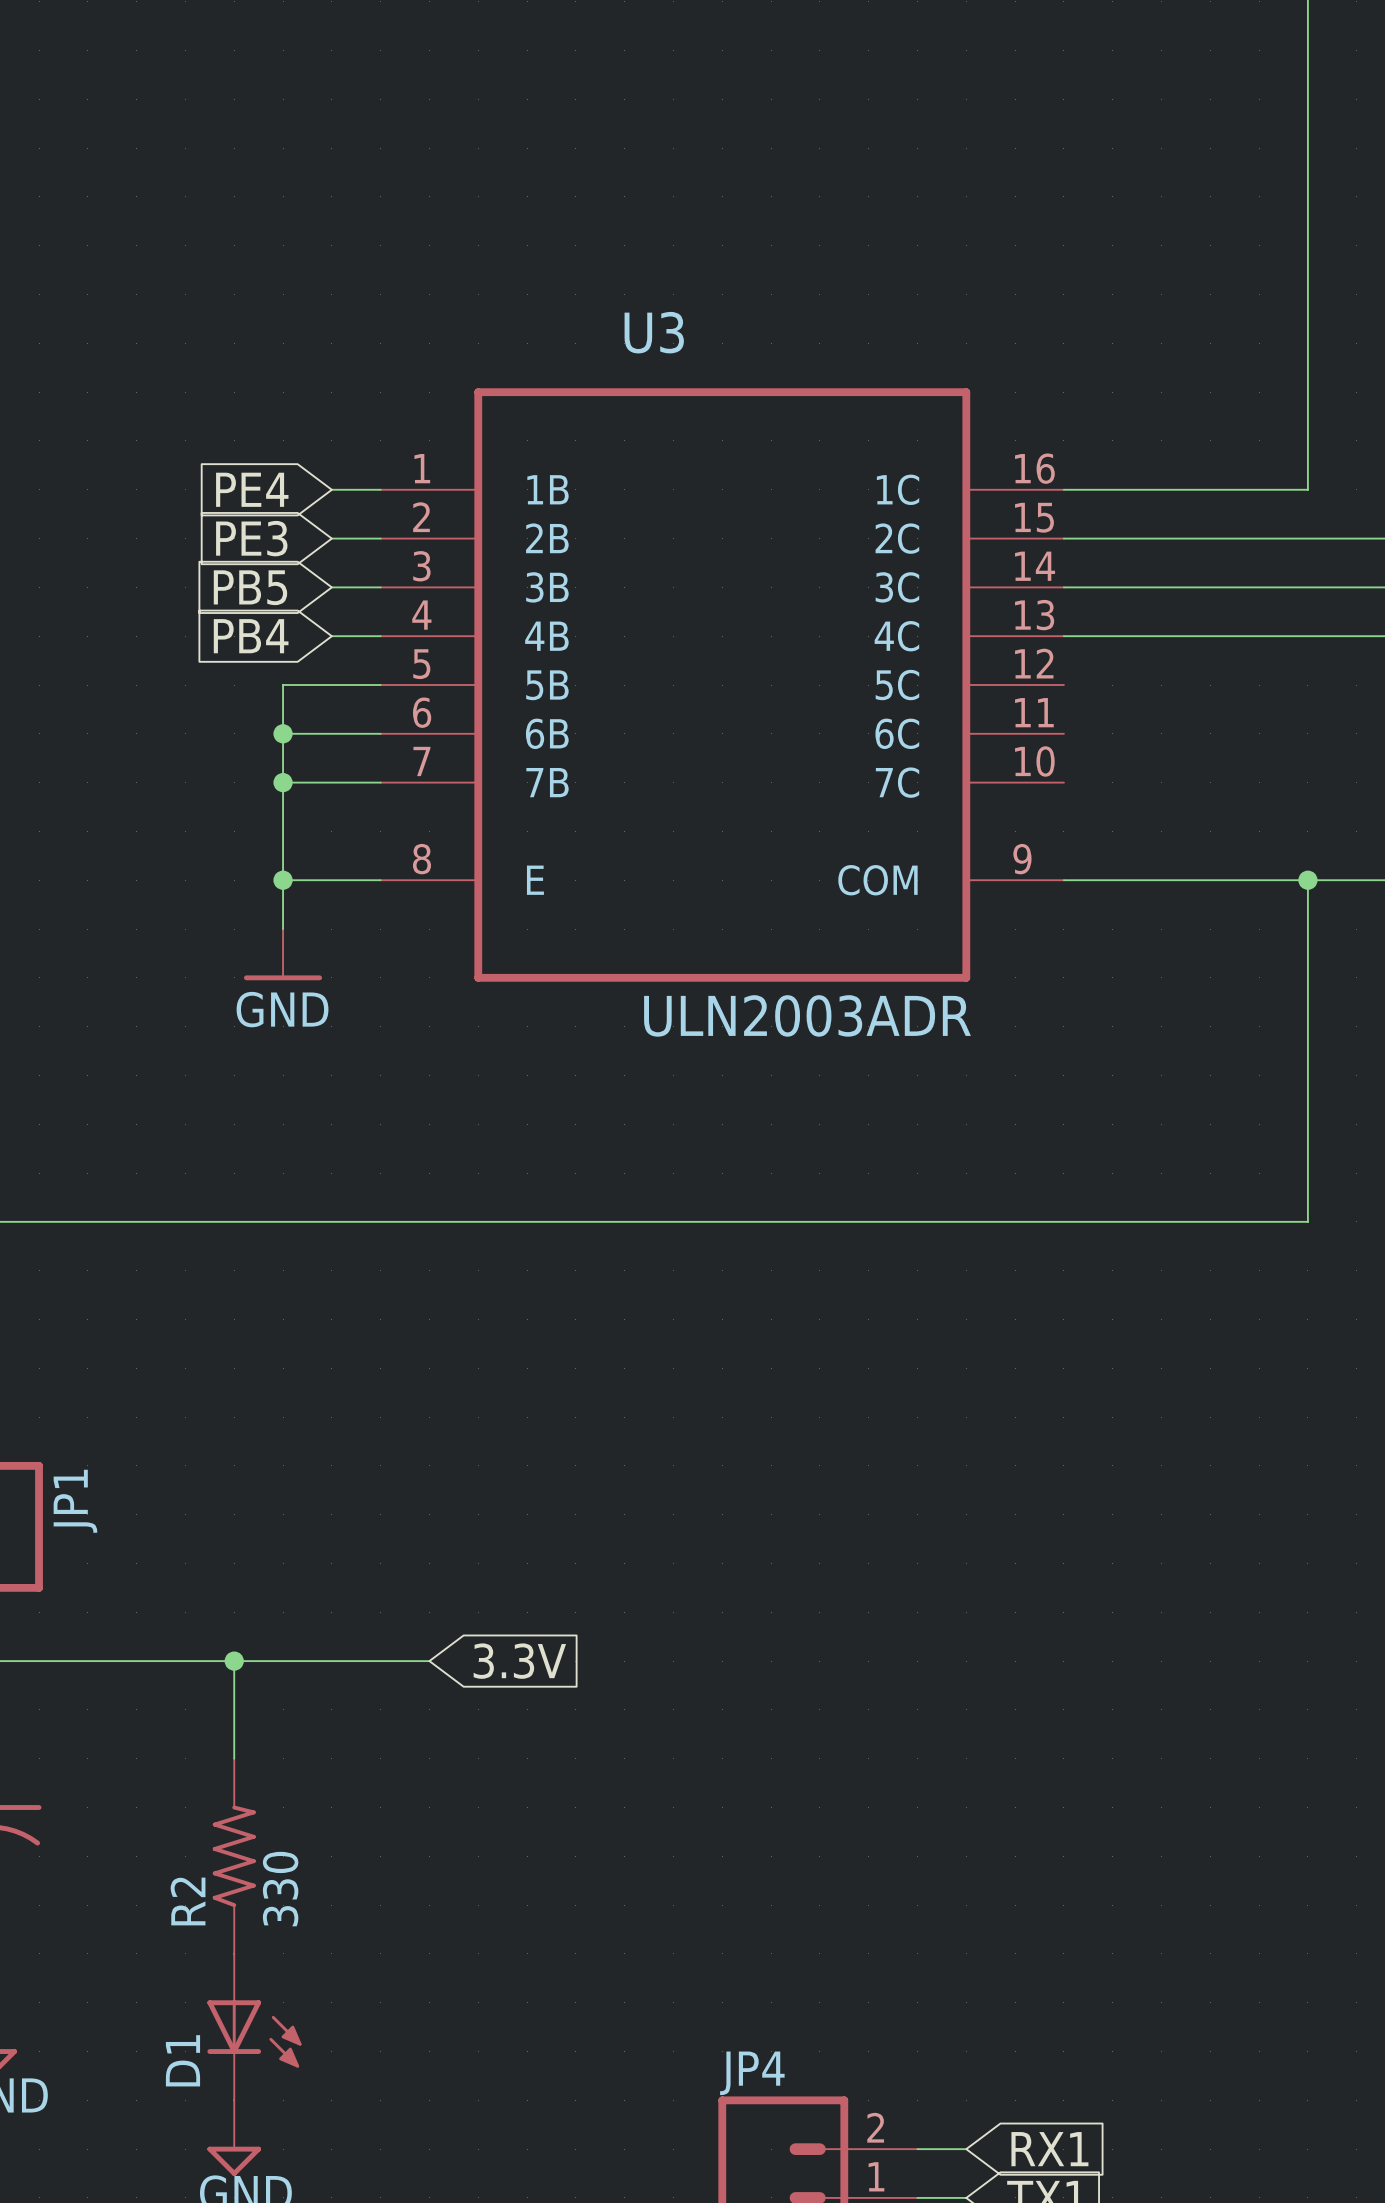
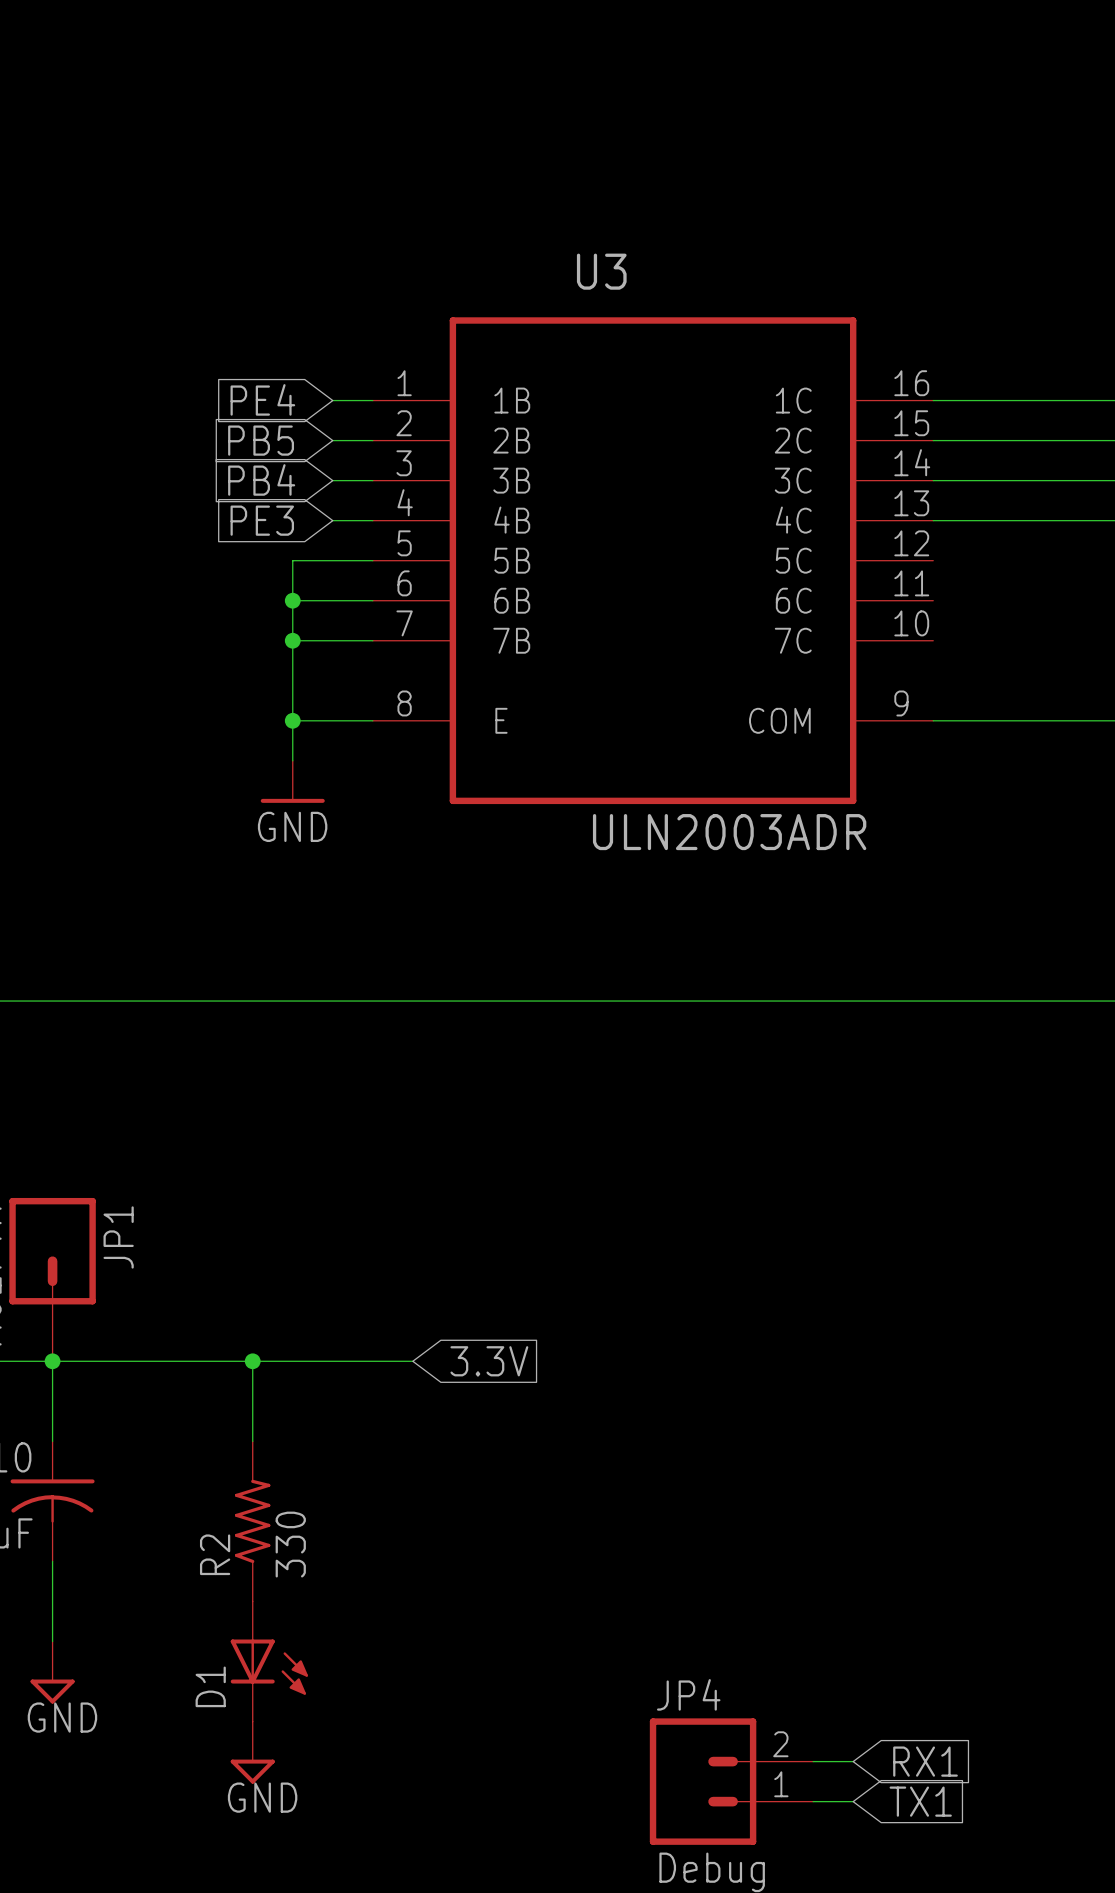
global label: PE3 (251, 538) -> PB5 (261, 440)
global label: PB5 (250, 587) -> PB4 (261, 479)
global label: PB4 (251, 636) -> PE3 (262, 520)

